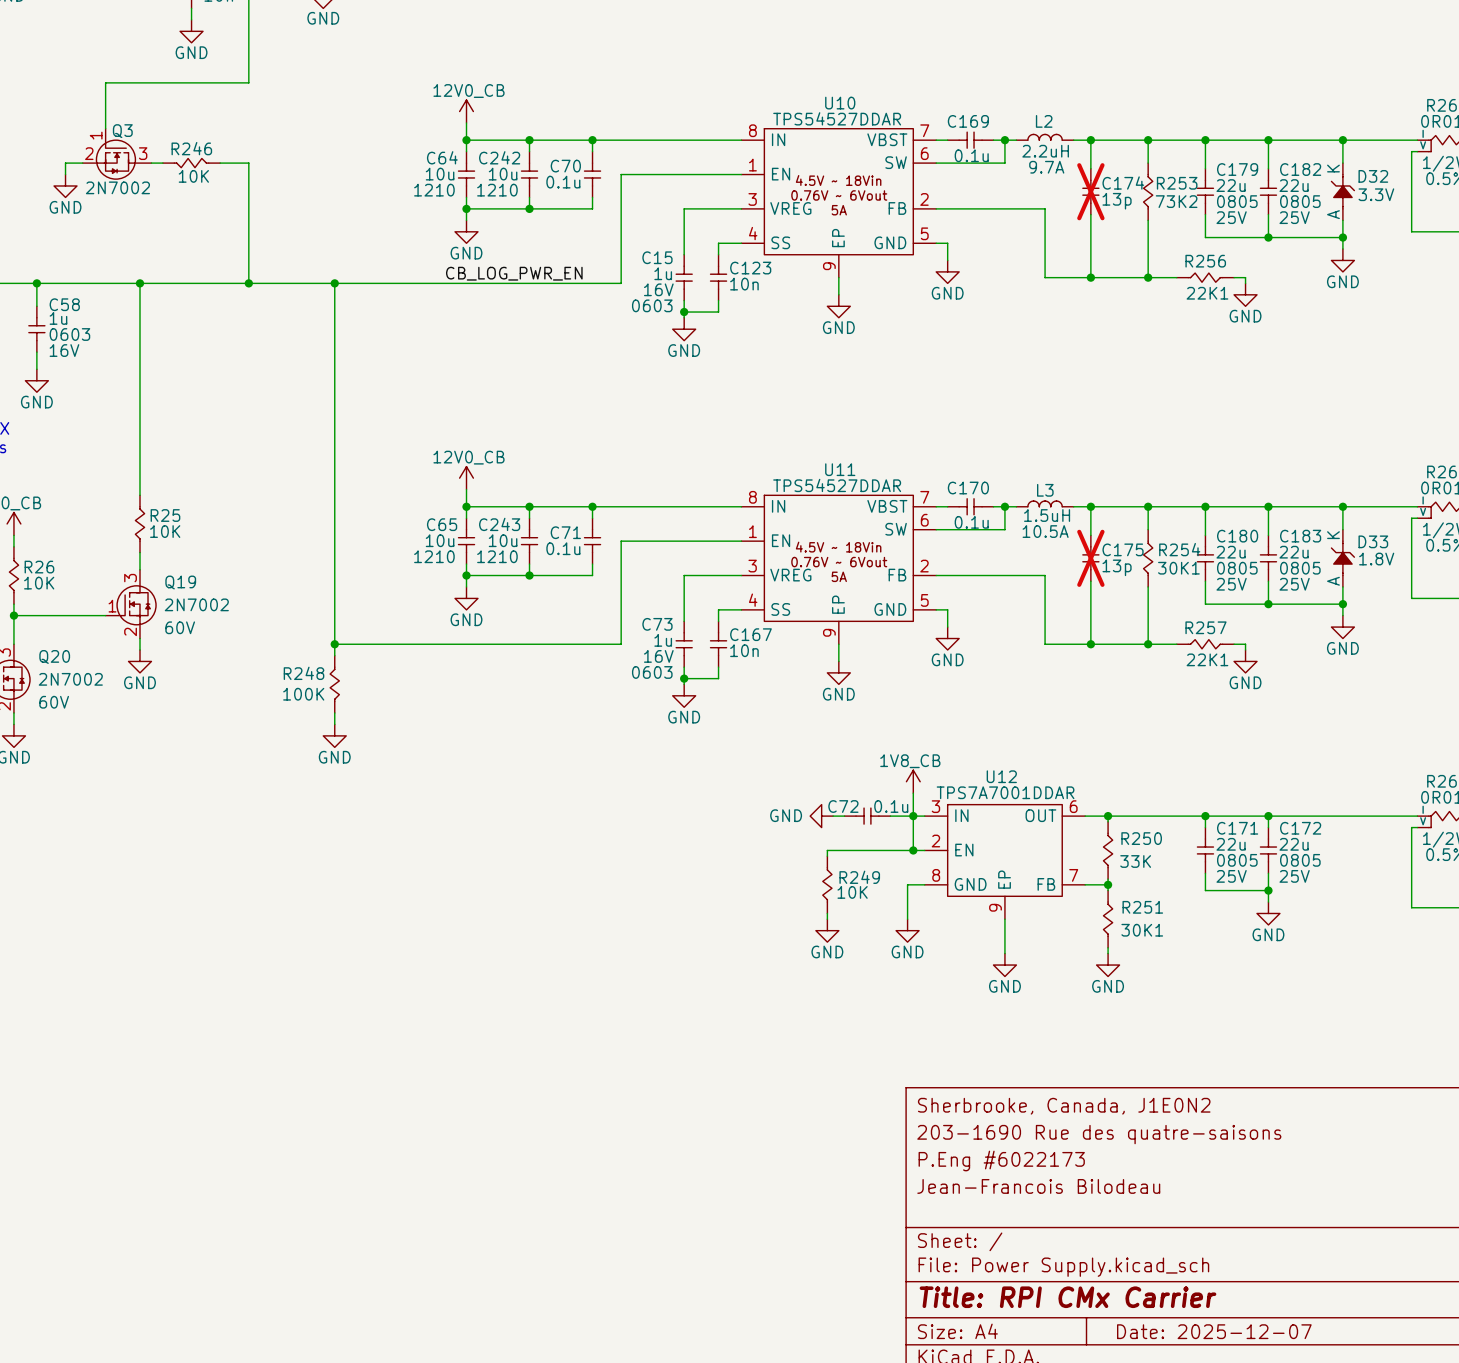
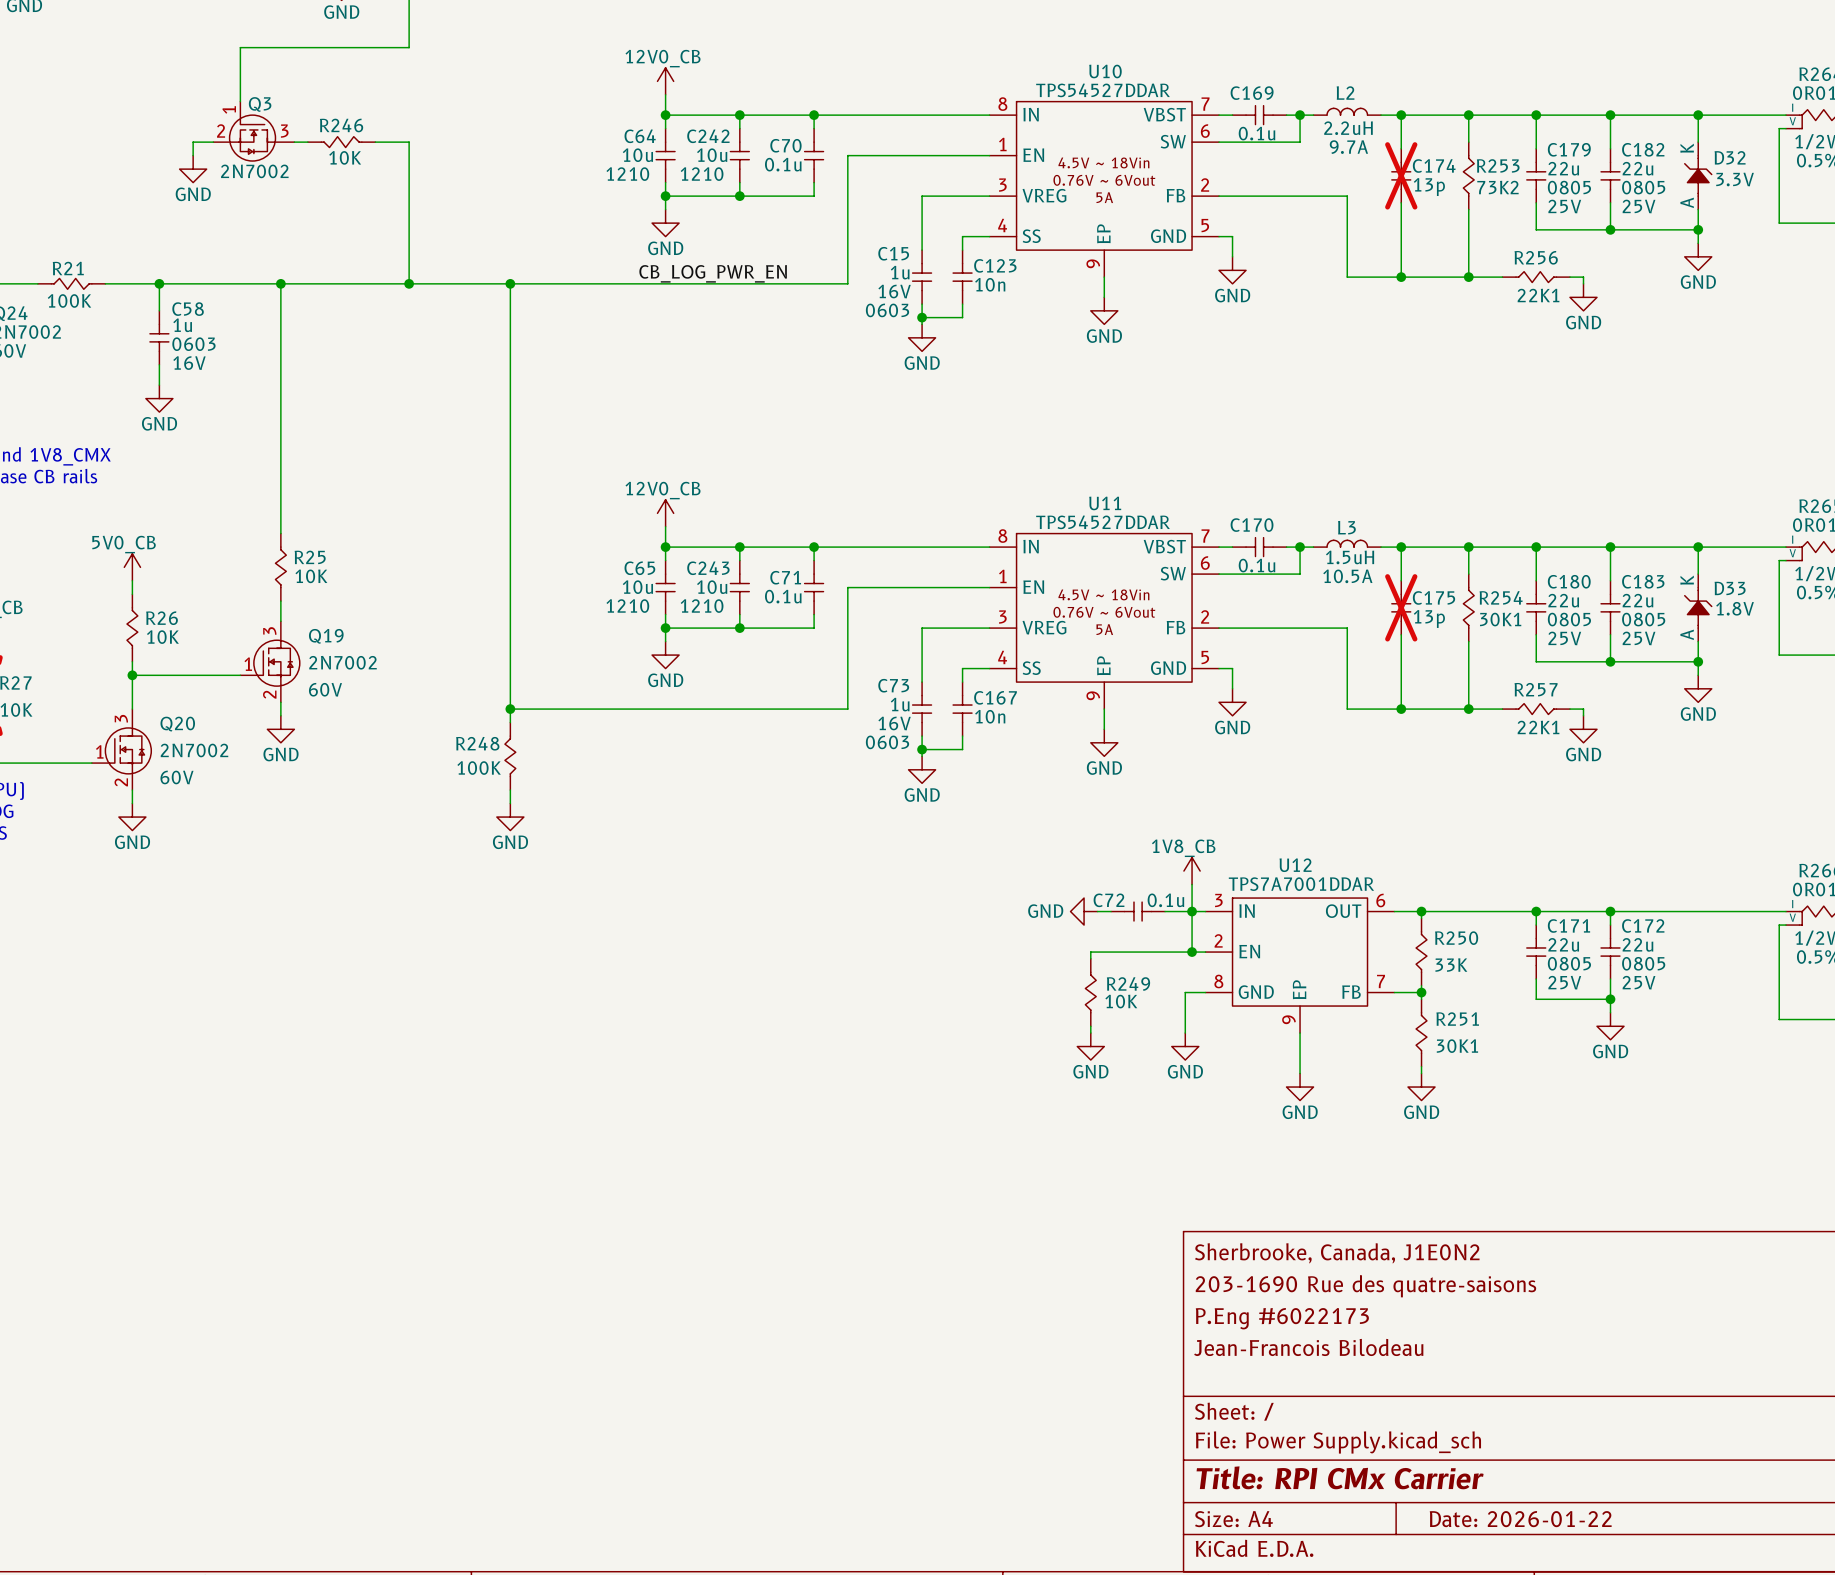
title block: Date: 2025-12-07 (1214, 1331) -> Date: 2026-01-22 (1520, 1519)

